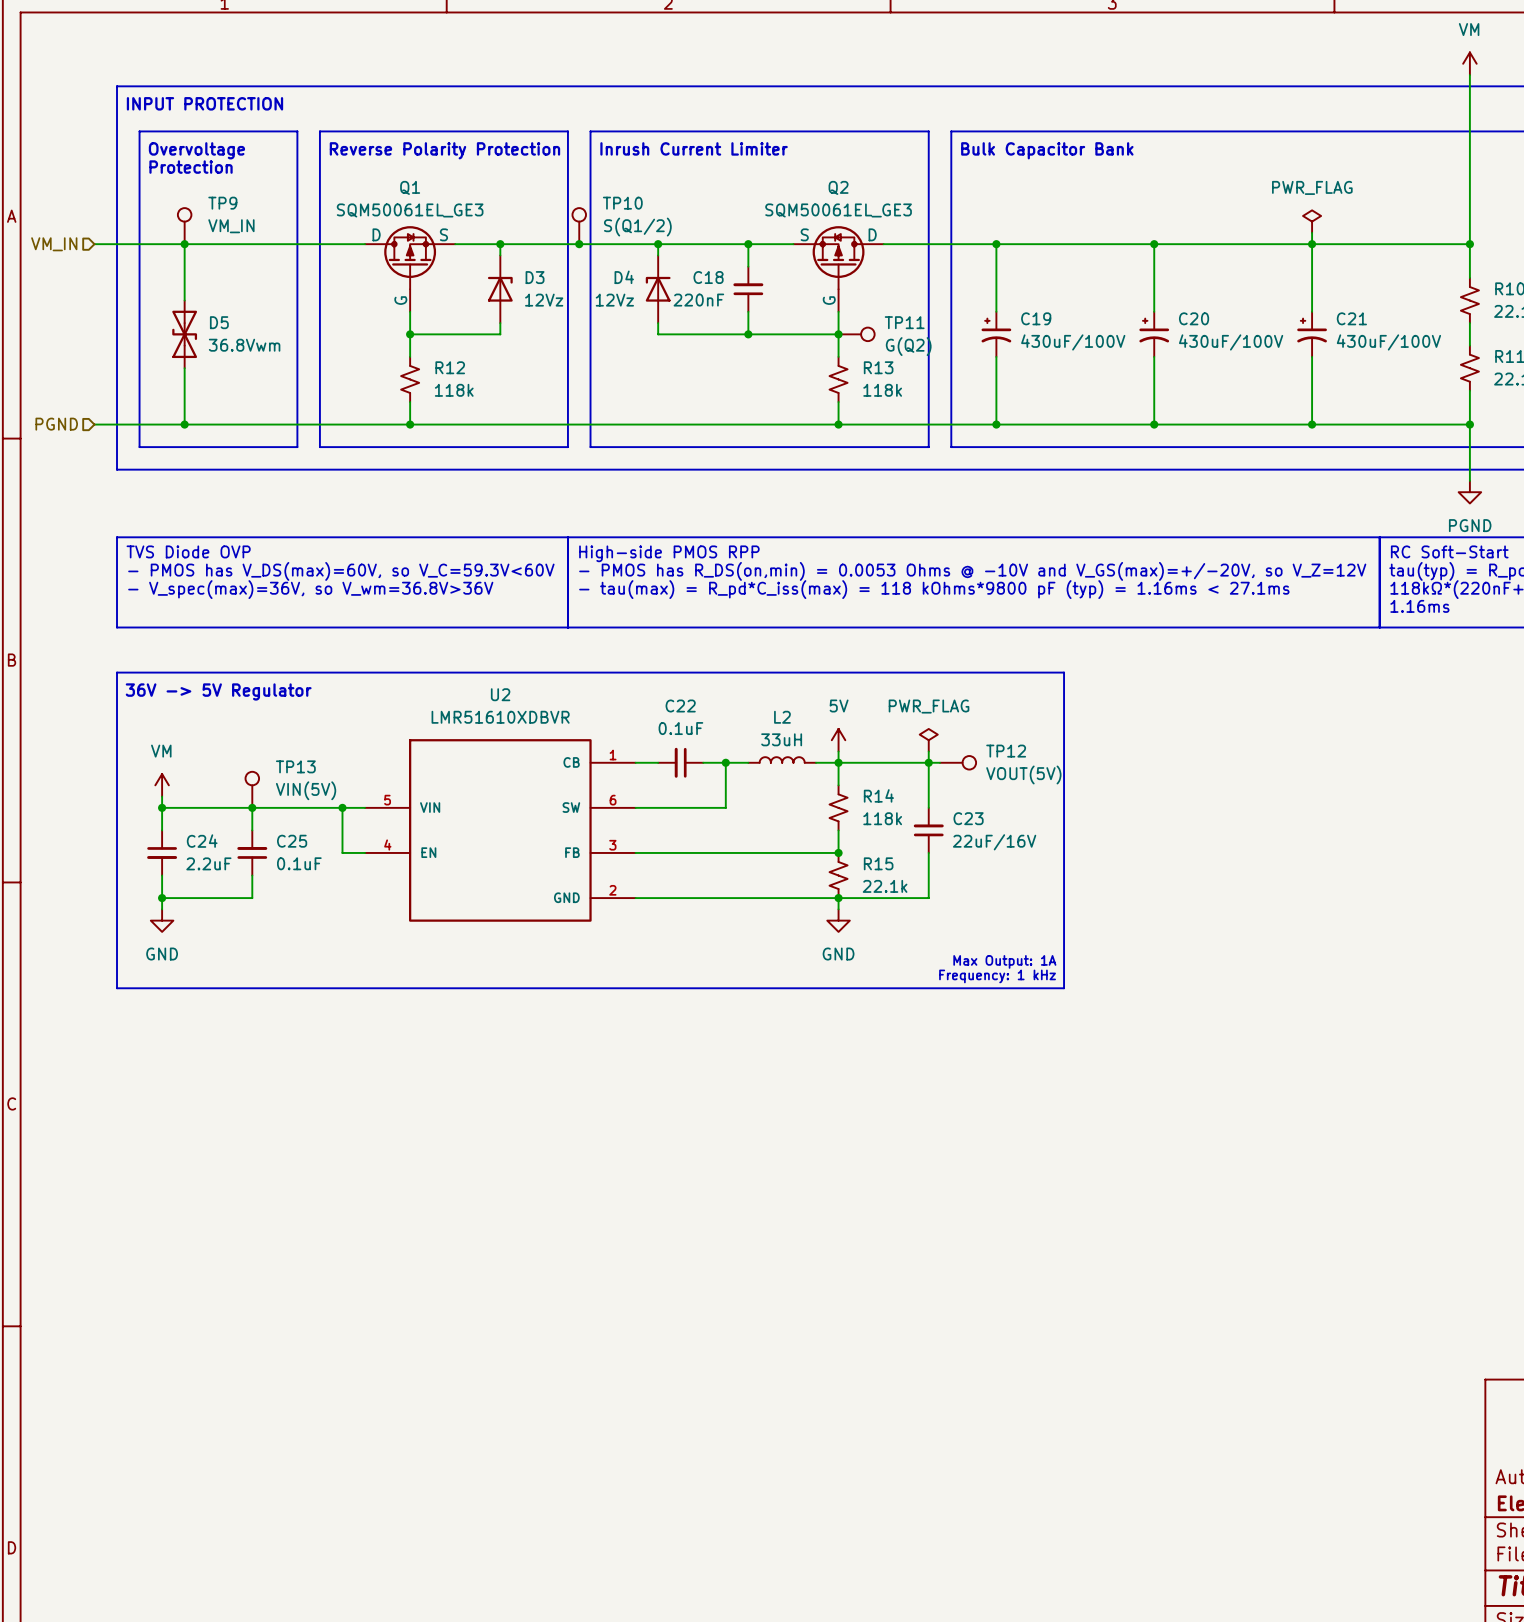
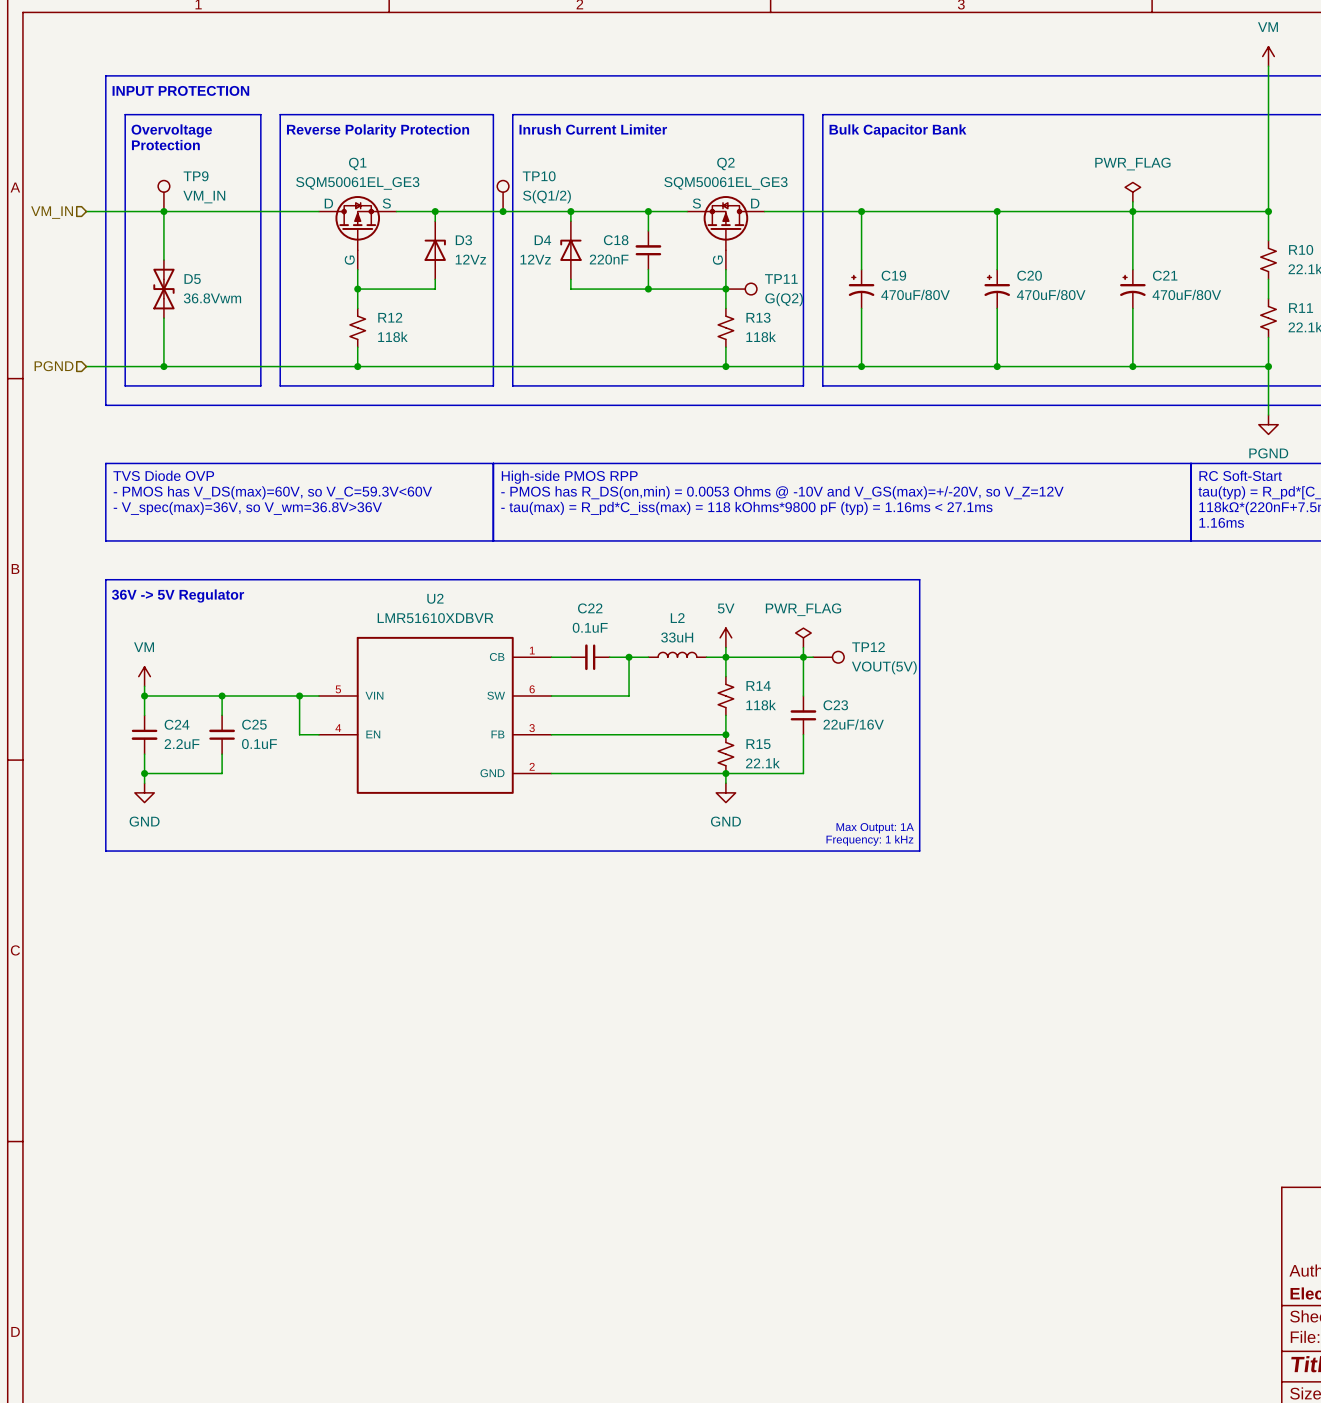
C19 value: 430uF/100V (1073, 342) -> 470uF/80V (915, 294)
C20 value: 430uF/100V (1231, 342) -> 470uF/80V (1051, 294)
C21 value: 430uF/100V (1388, 342) -> 470uF/80V (1186, 294)
TP13: VIN(5V) (252, 789) -> none

